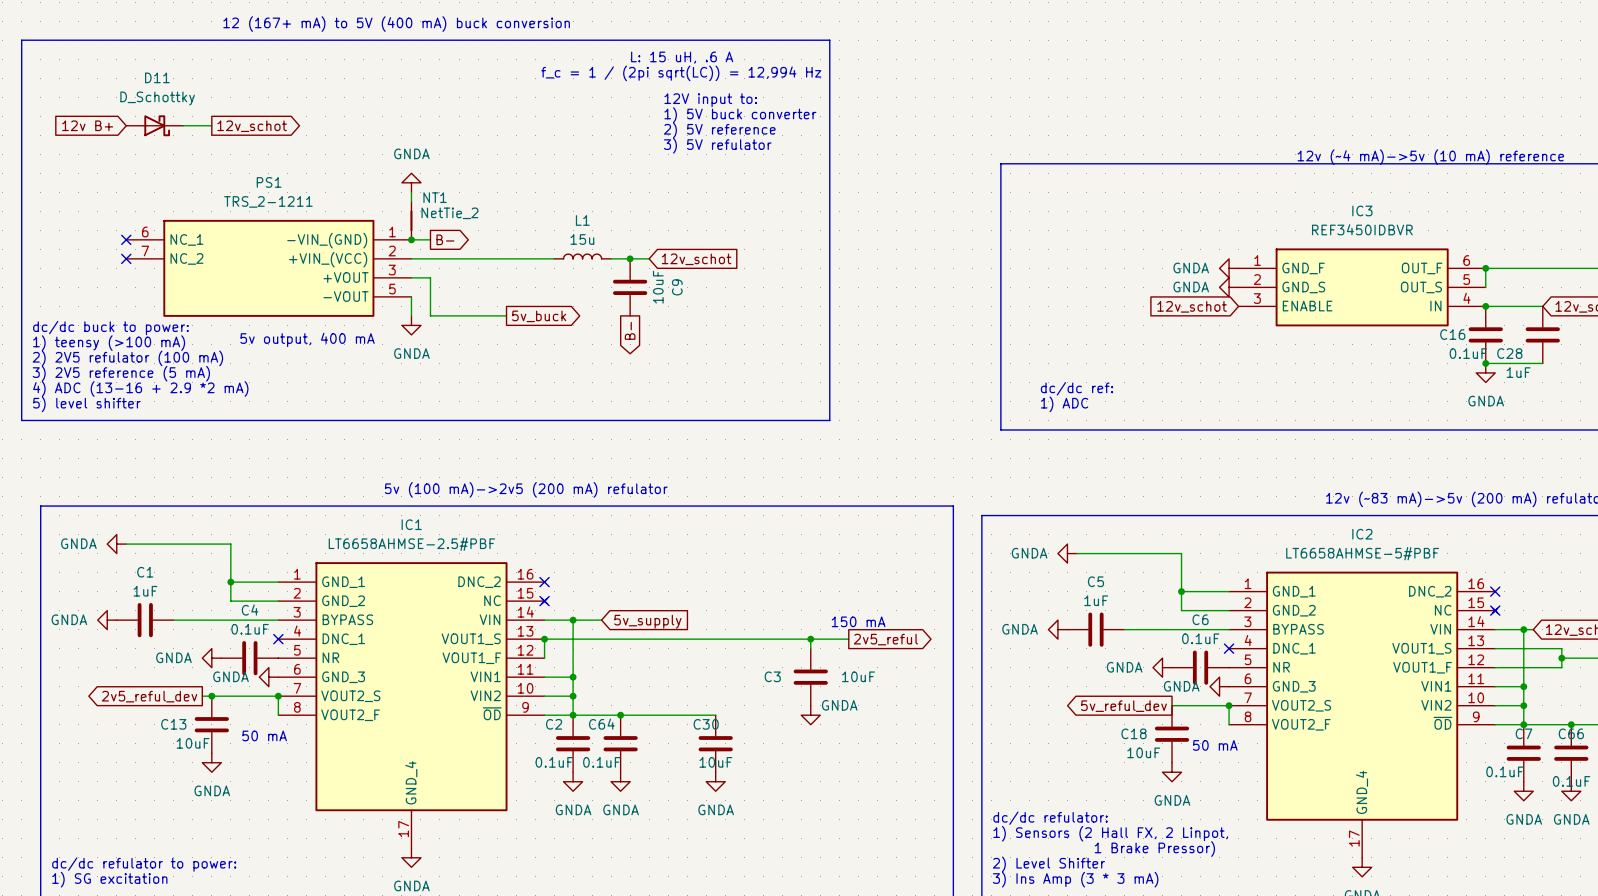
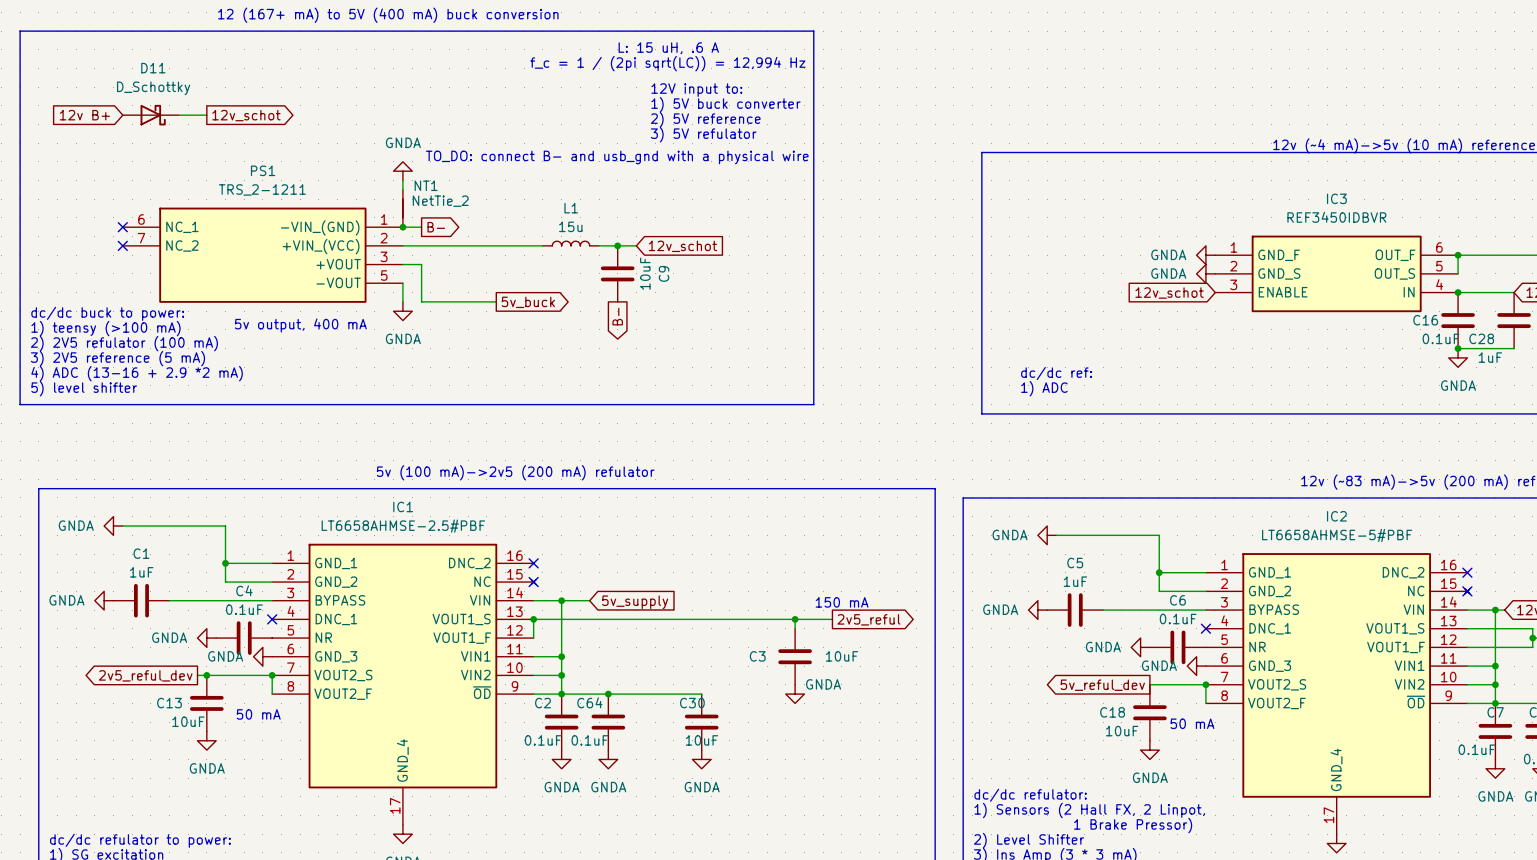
text: none -> TO_DO: connect B- and usb_gnd with a physical wire (617, 157)

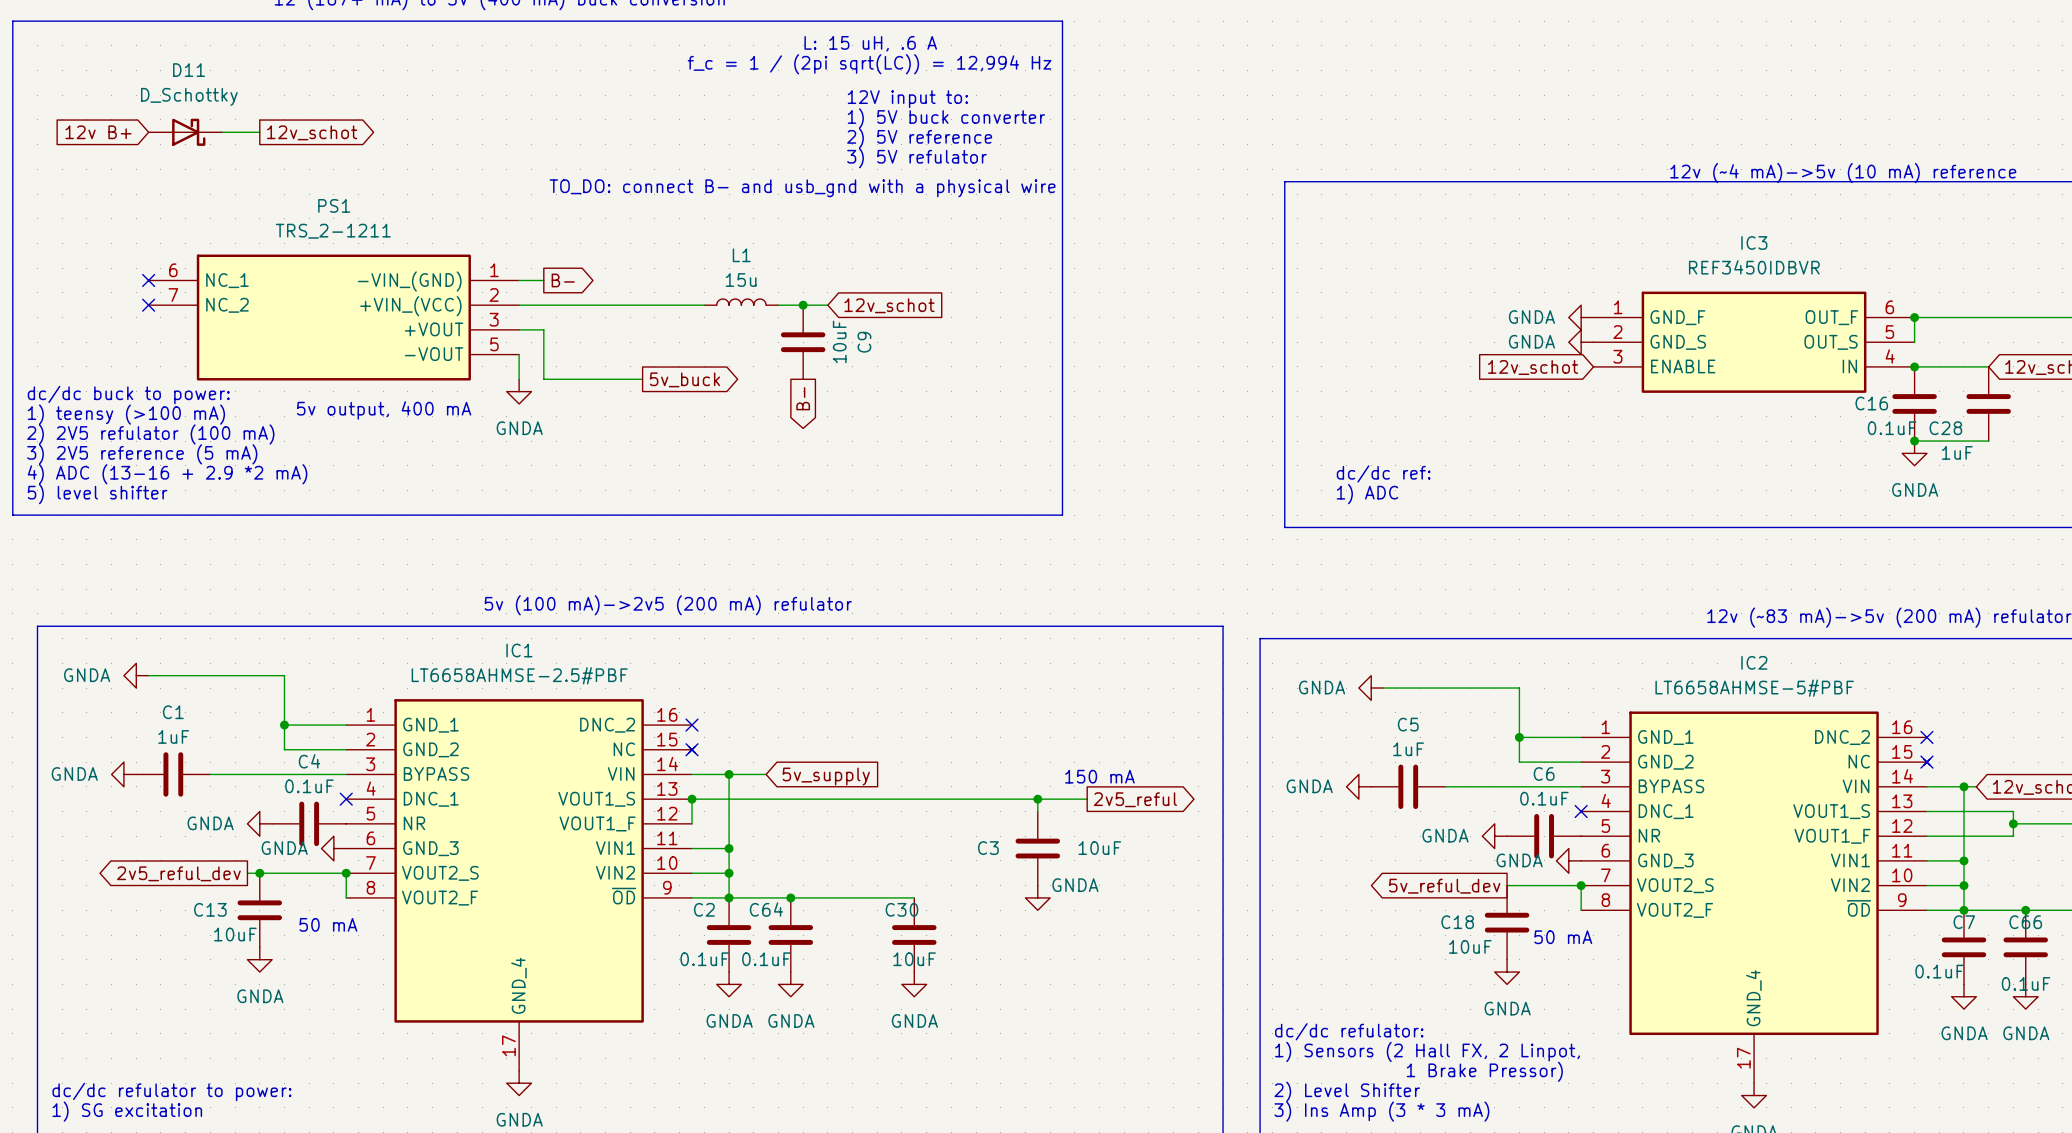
power symbol: GNDA (402, 171) -> none
wire: (402, 180) (402, 189) -> none
NT1: NetTie_2 (402, 208) -> none
junction: (402, 227) -> none

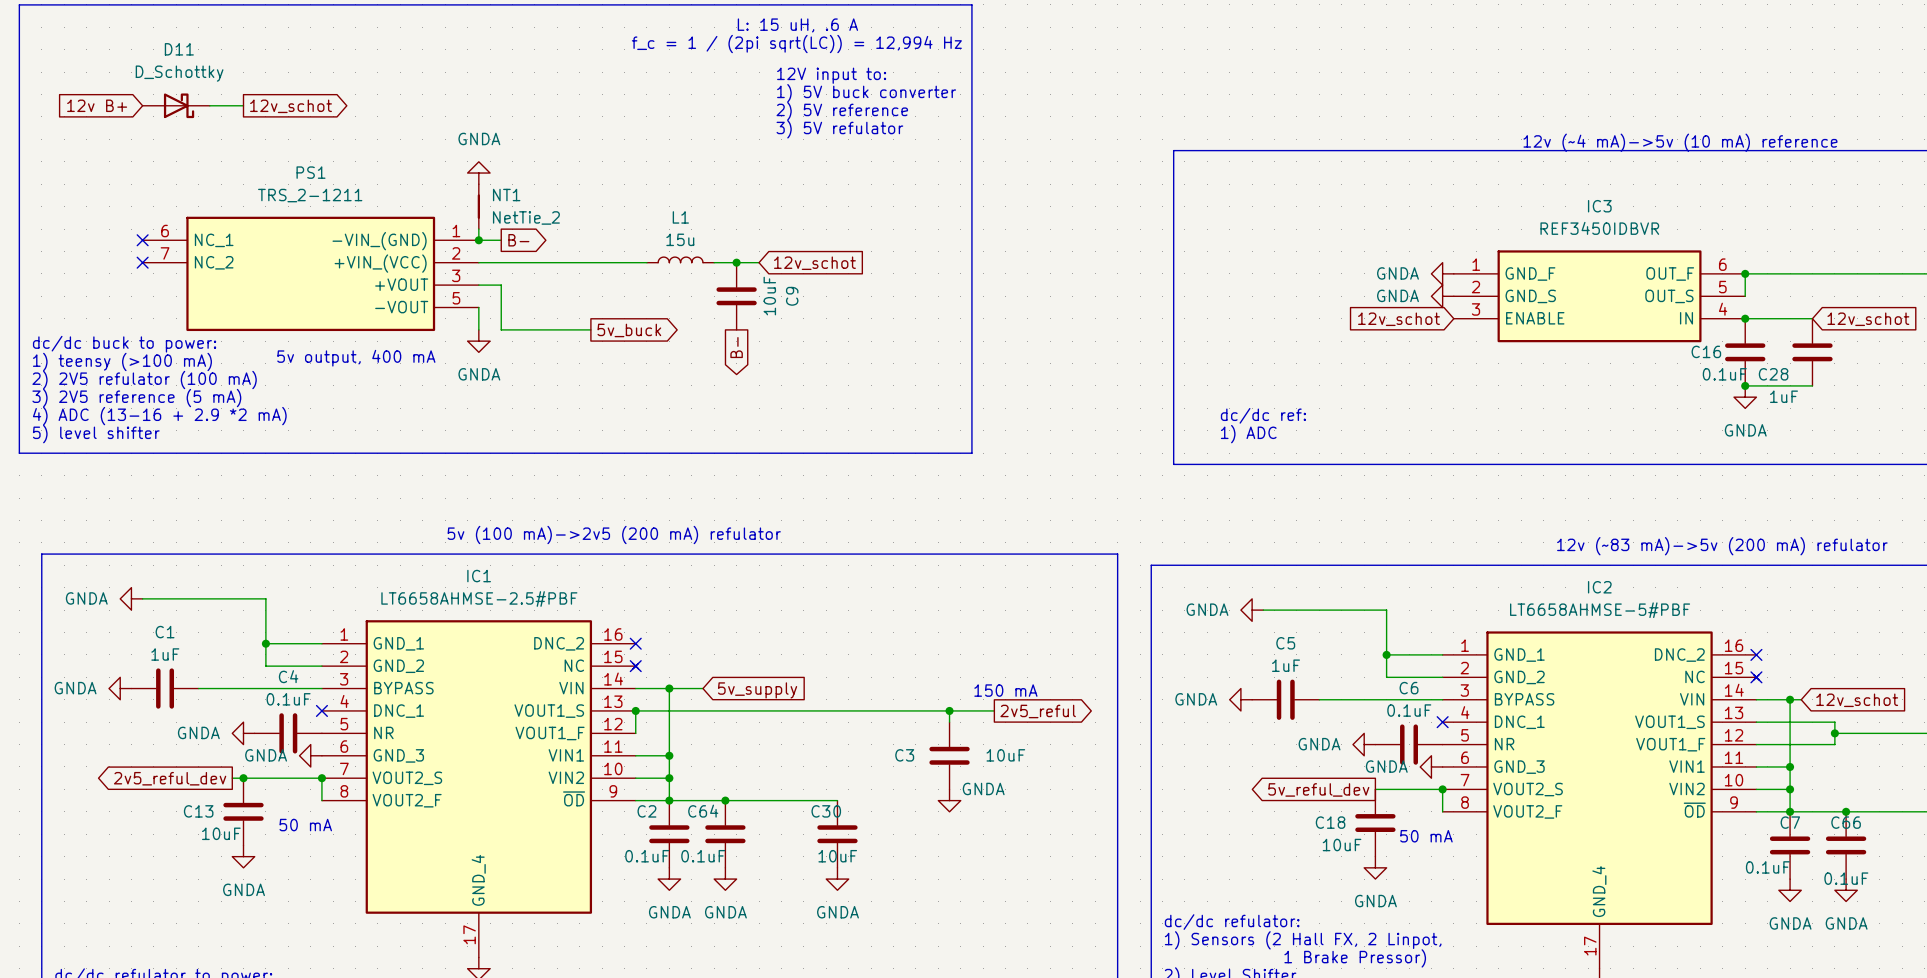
text: TO_DO: connect B- and usb_gnd with a physical wire (802, 188) -> none
power symbol: none -> GNDA (478, 173)
NT1: none -> NetTie_2 (478, 206)
wire: none -> (478, 229) (478, 240)
junction: none -> (478, 240)

